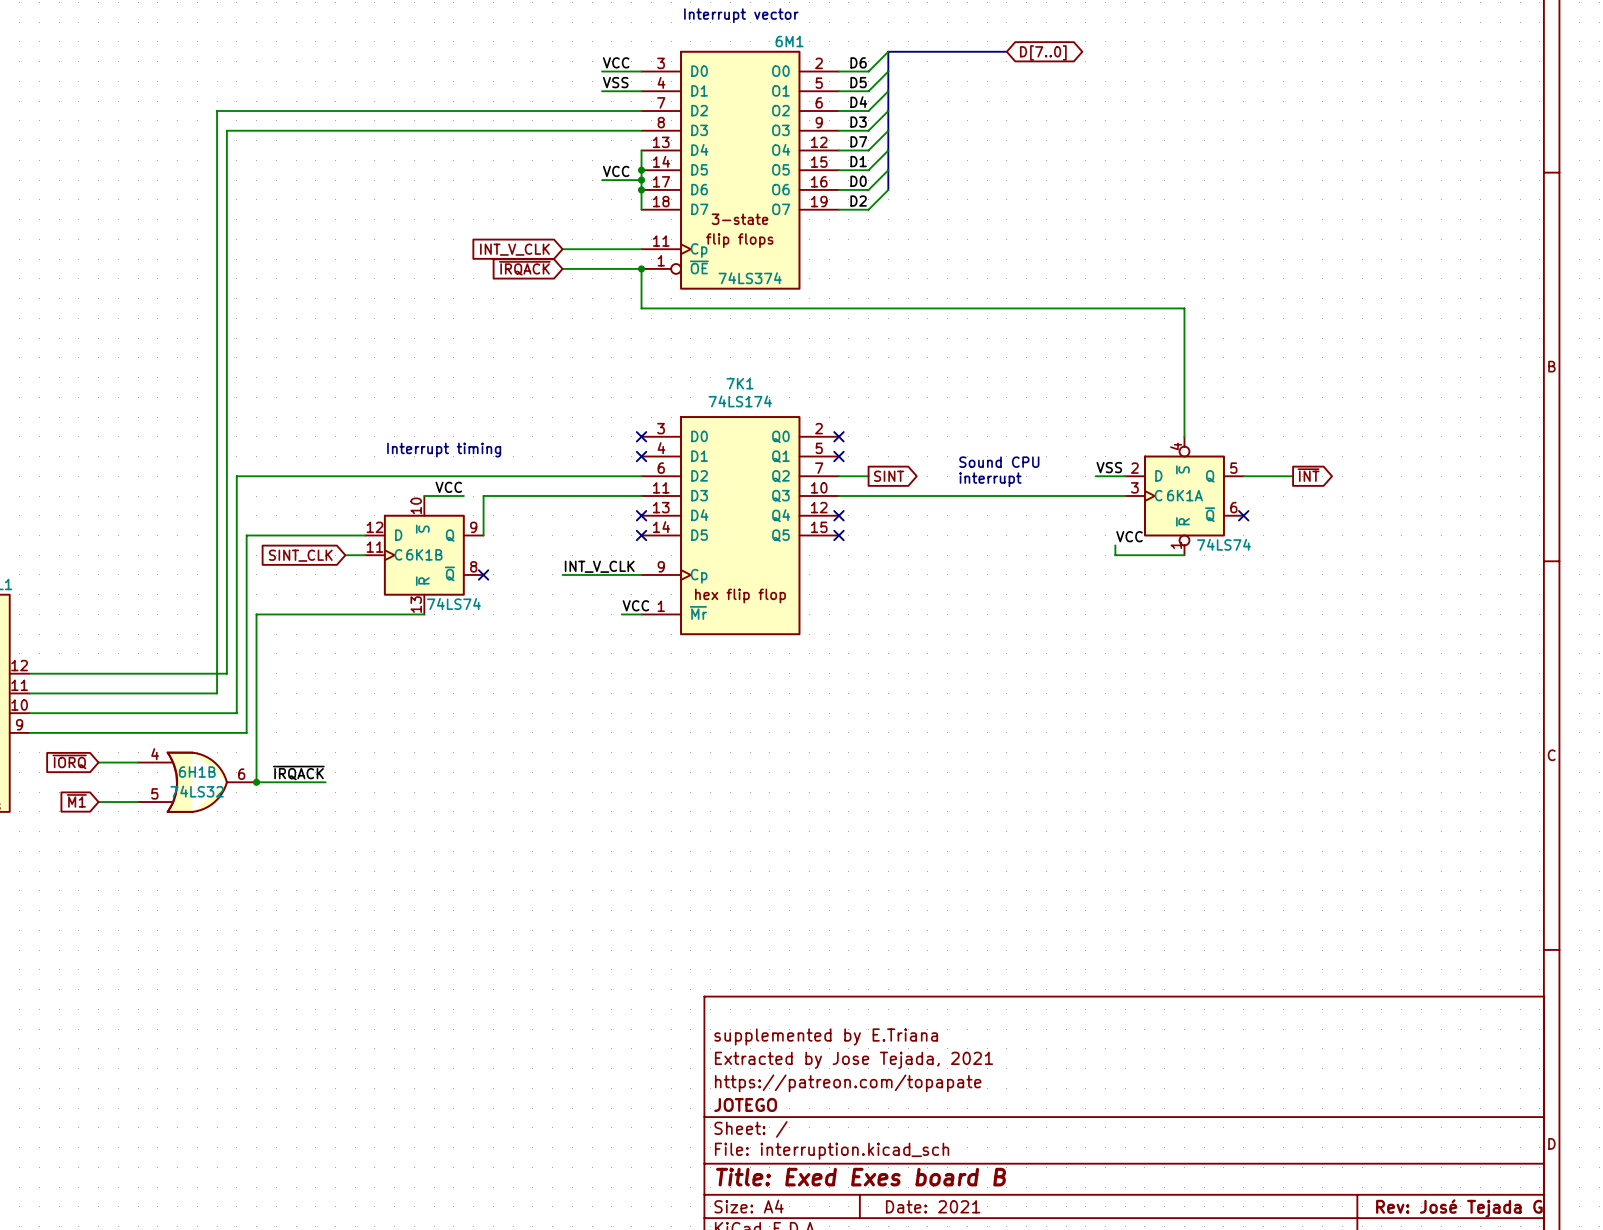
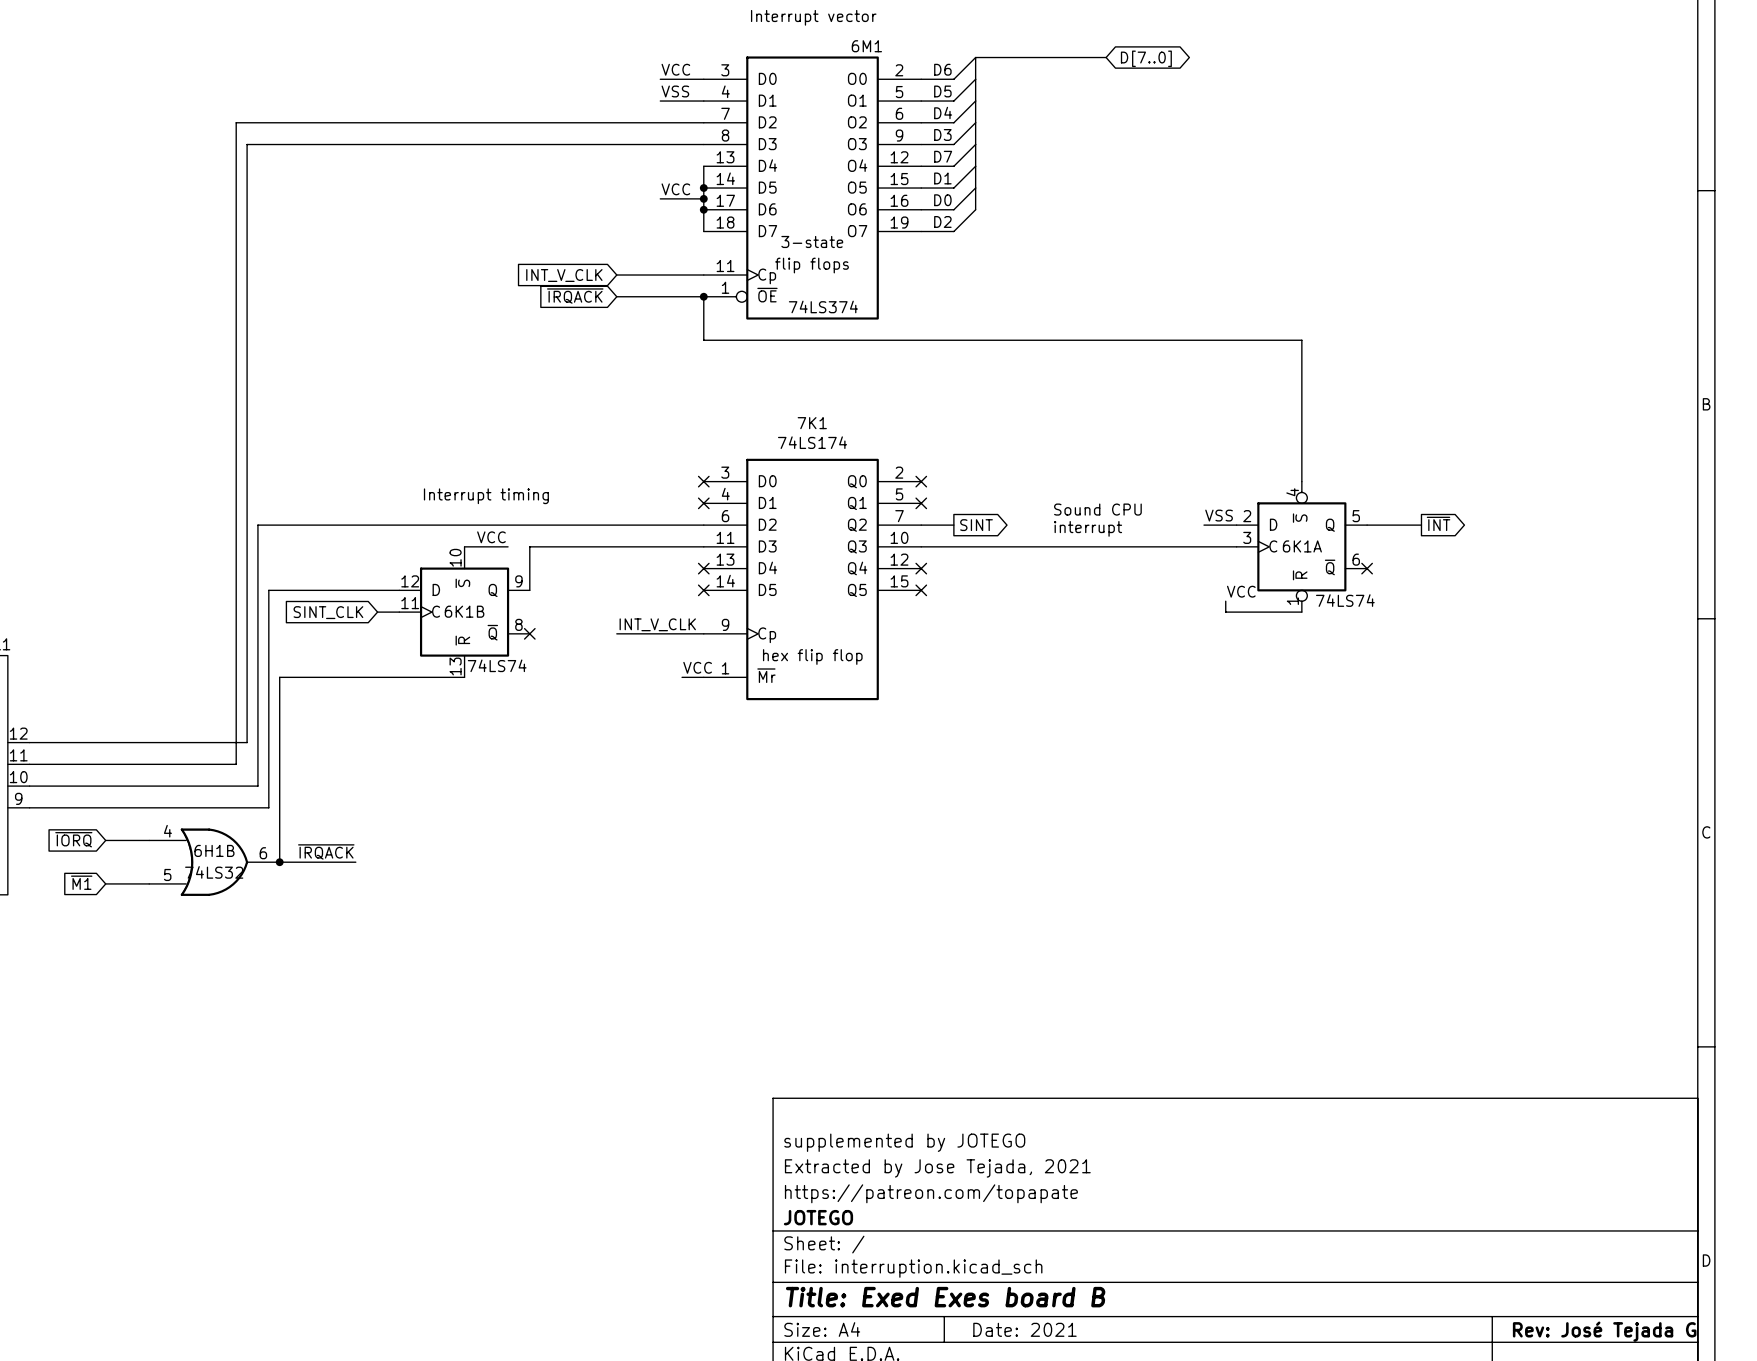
title block: supplemented by E.Triana (826, 1036) -> supplemented by JOTEGO (904, 1142)

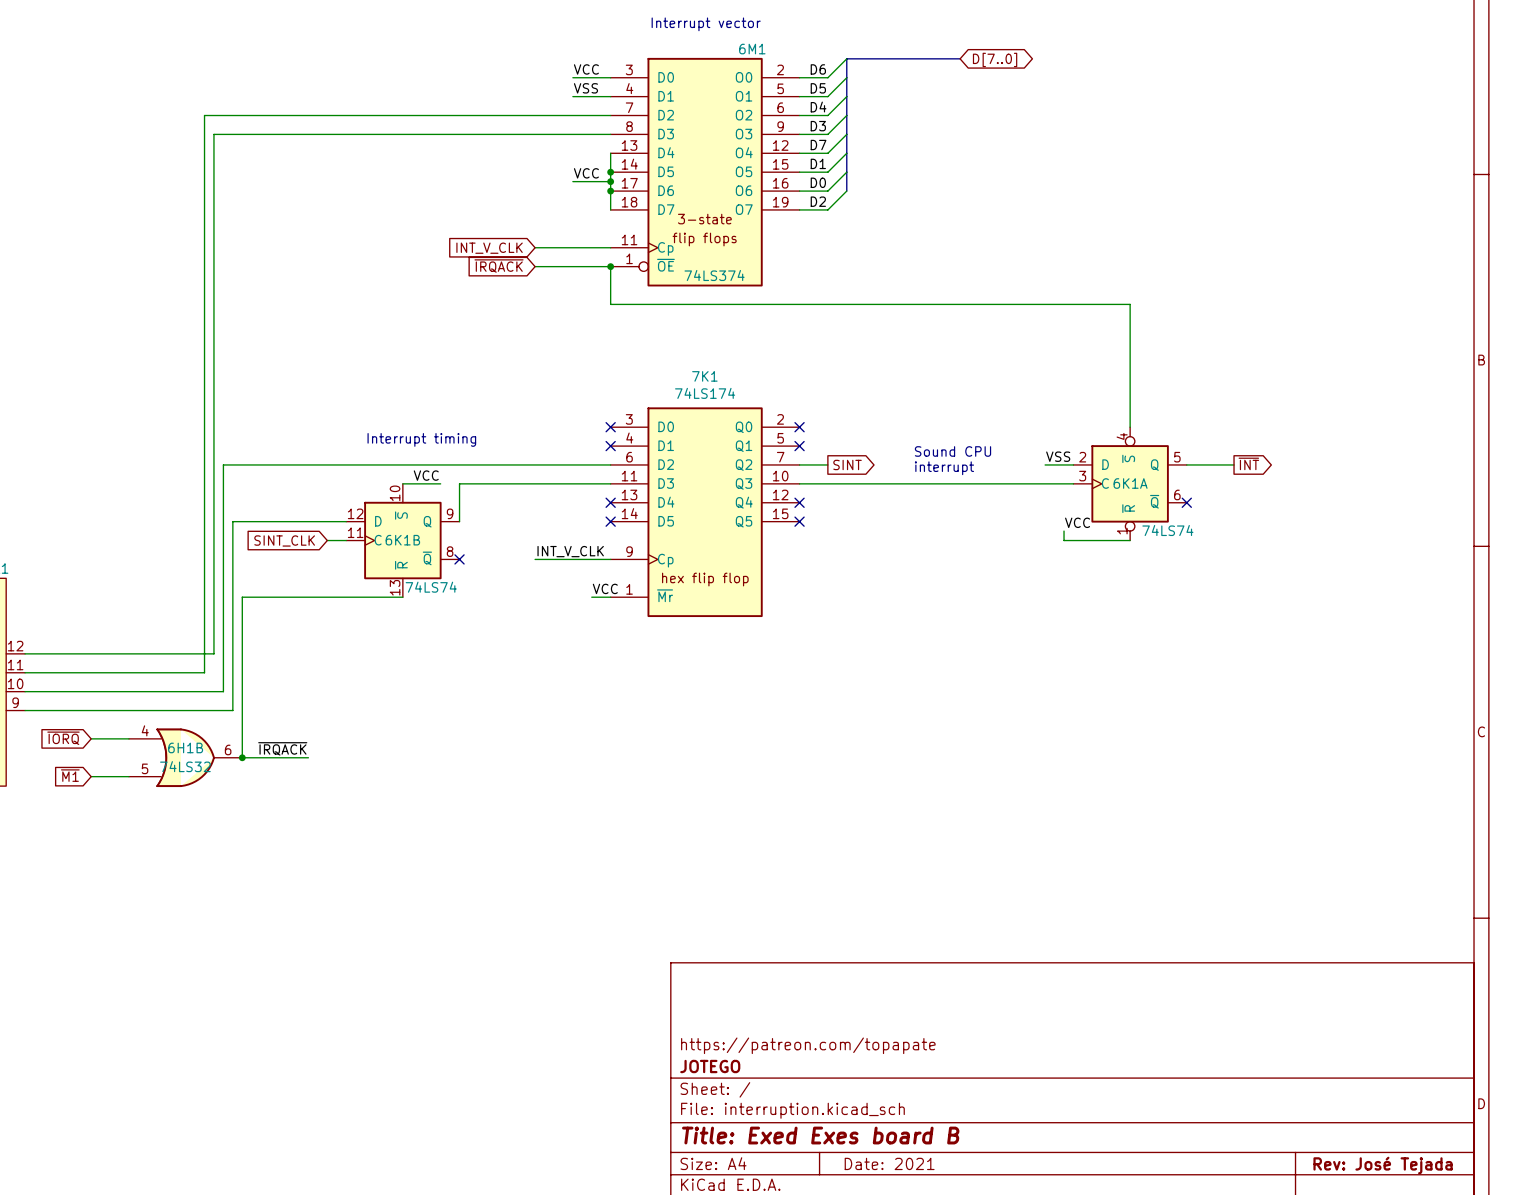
title block: supplemented by JOTEGO (904, 1142) -> none
title block: Extracted by Jose Tejada, 2021 (937, 1168) -> none
title block: Rev: José Tejada G (1604, 1331) -> Rev: José Tejada (1383, 1165)

